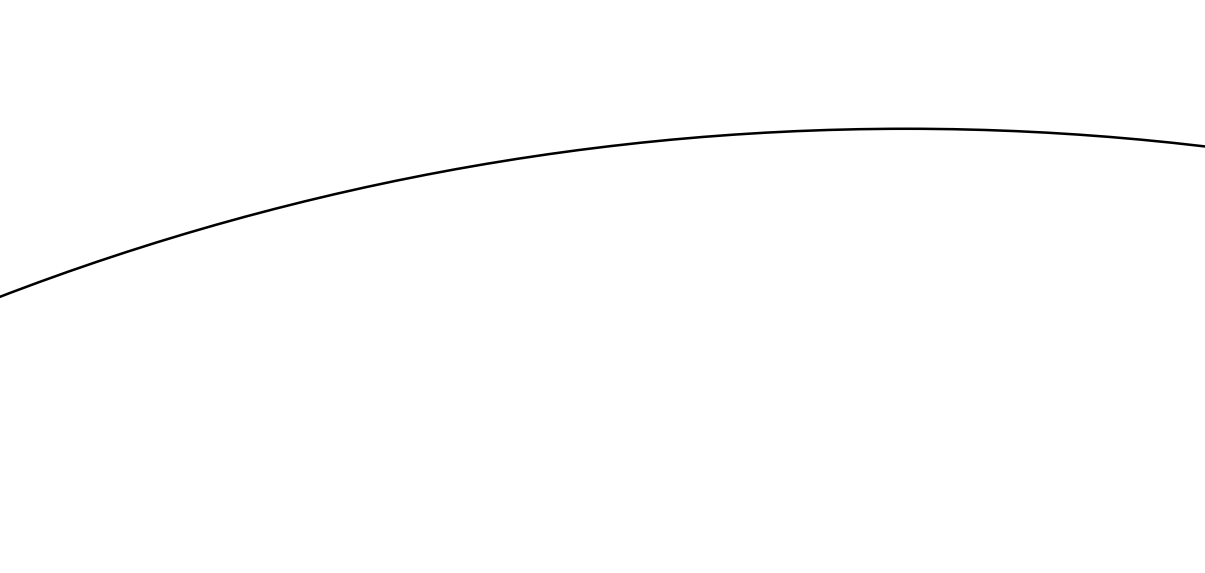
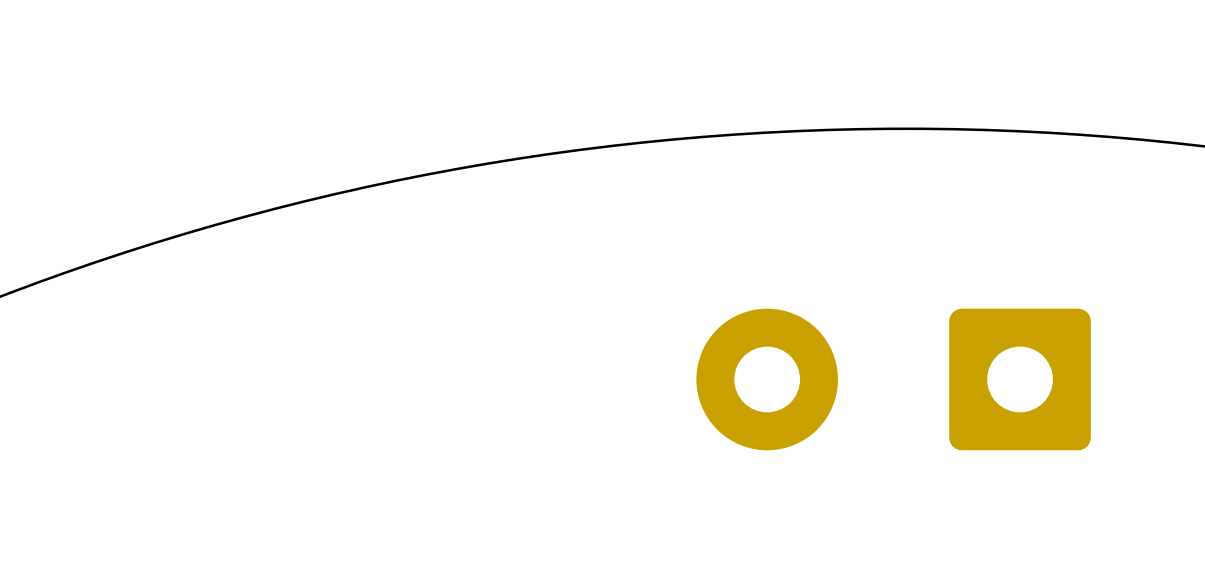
part: none -> (893, 379)

